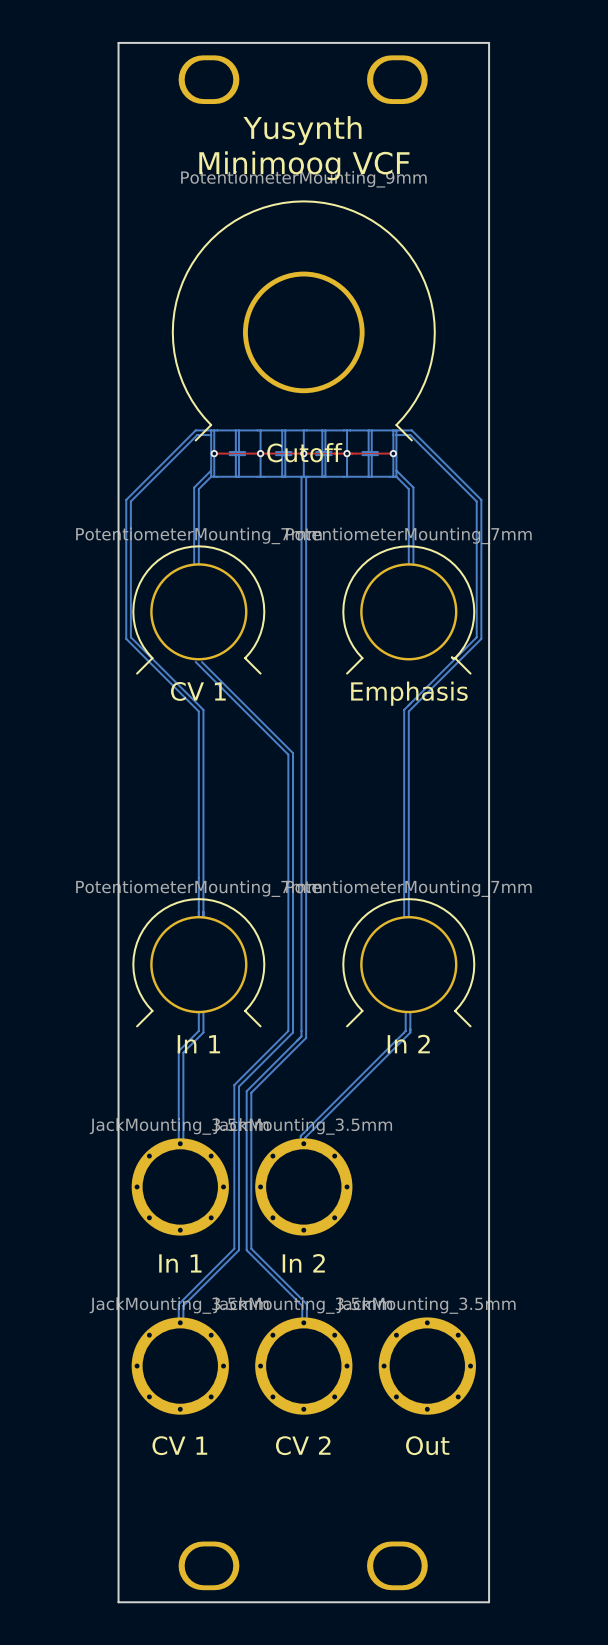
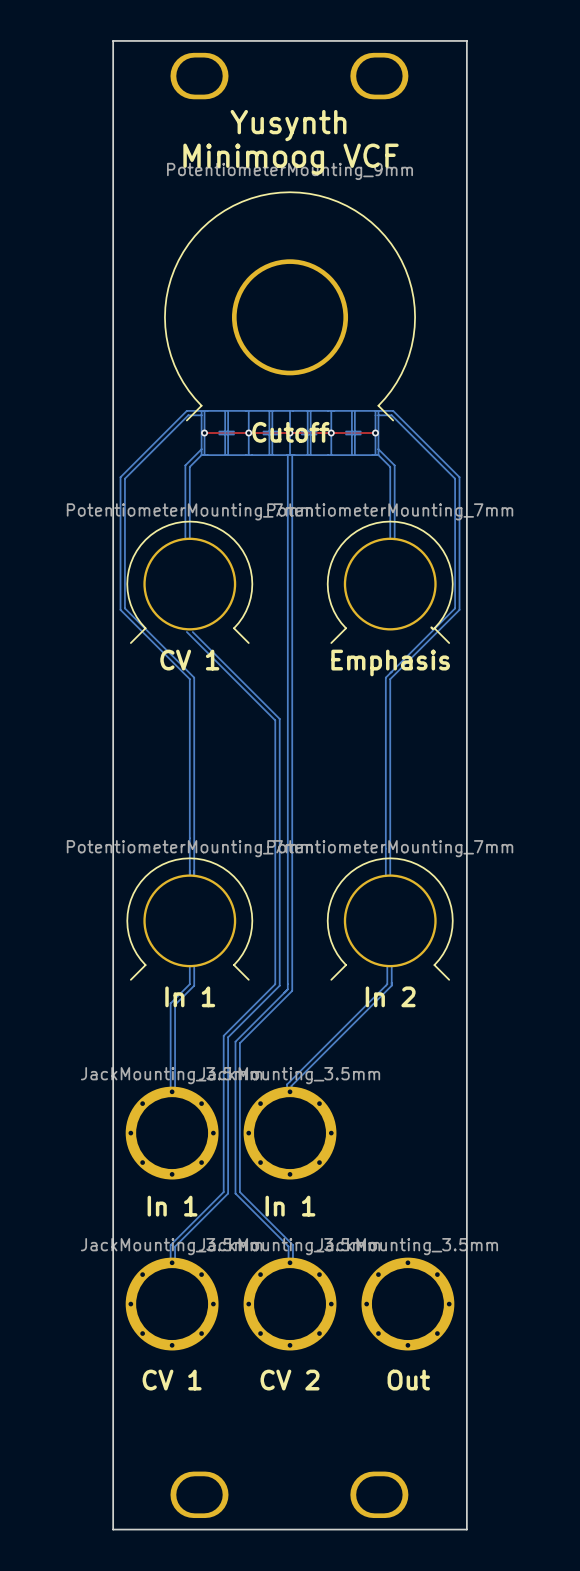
In 2 name: In 2 (303, 1263) -> In 1 (290, 1206)

